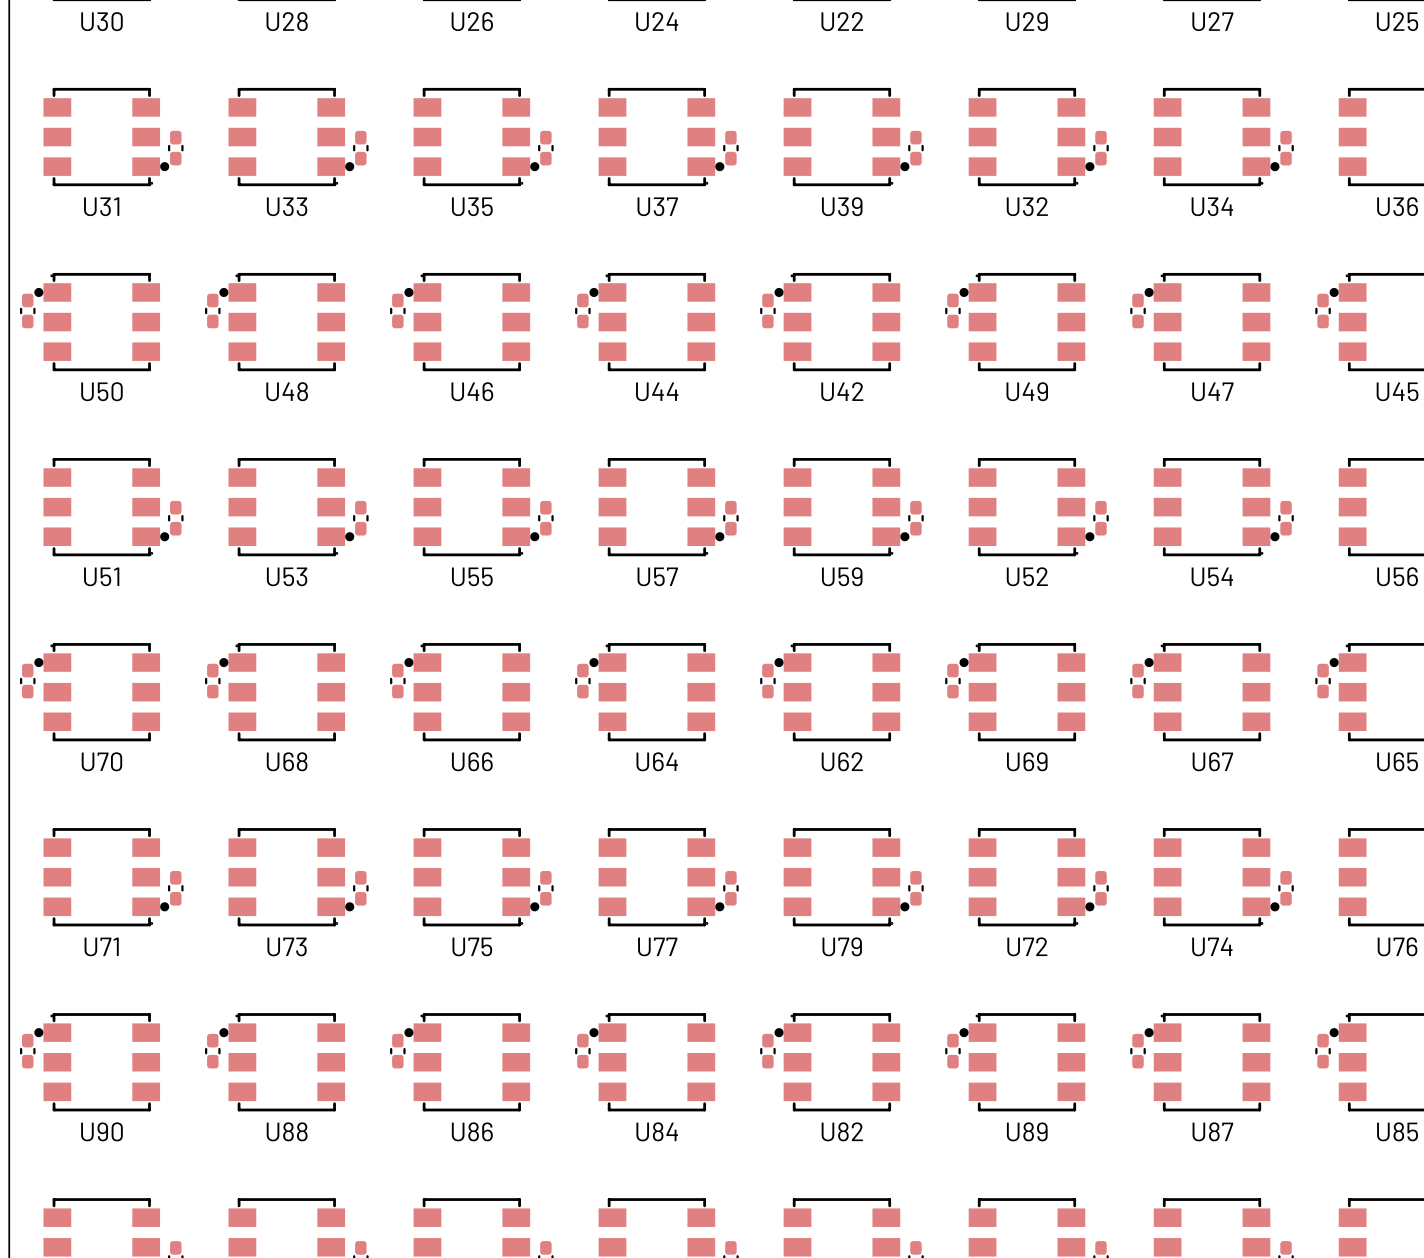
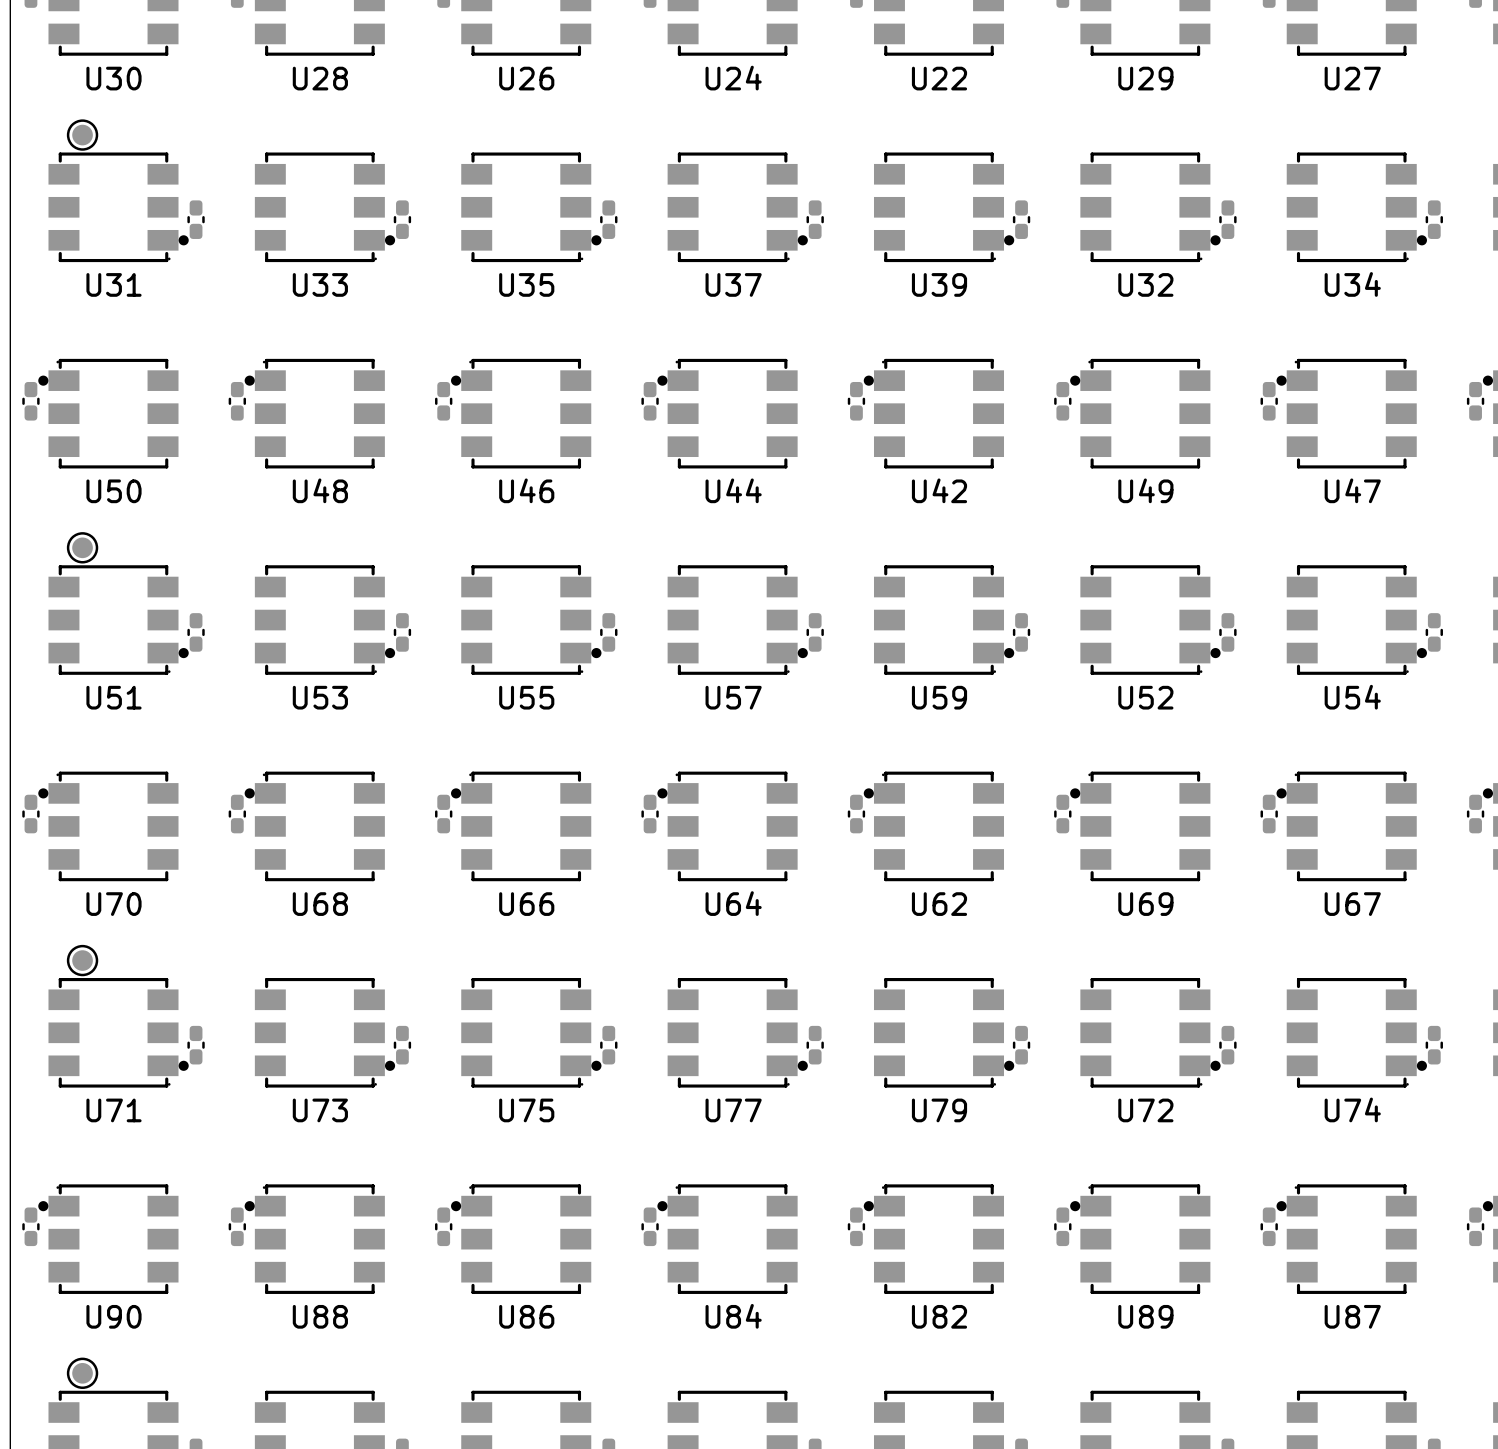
part: none -> (82, 135)
part: none -> (82, 547)
part: none -> (82, 960)
part: none -> (82, 1373)

